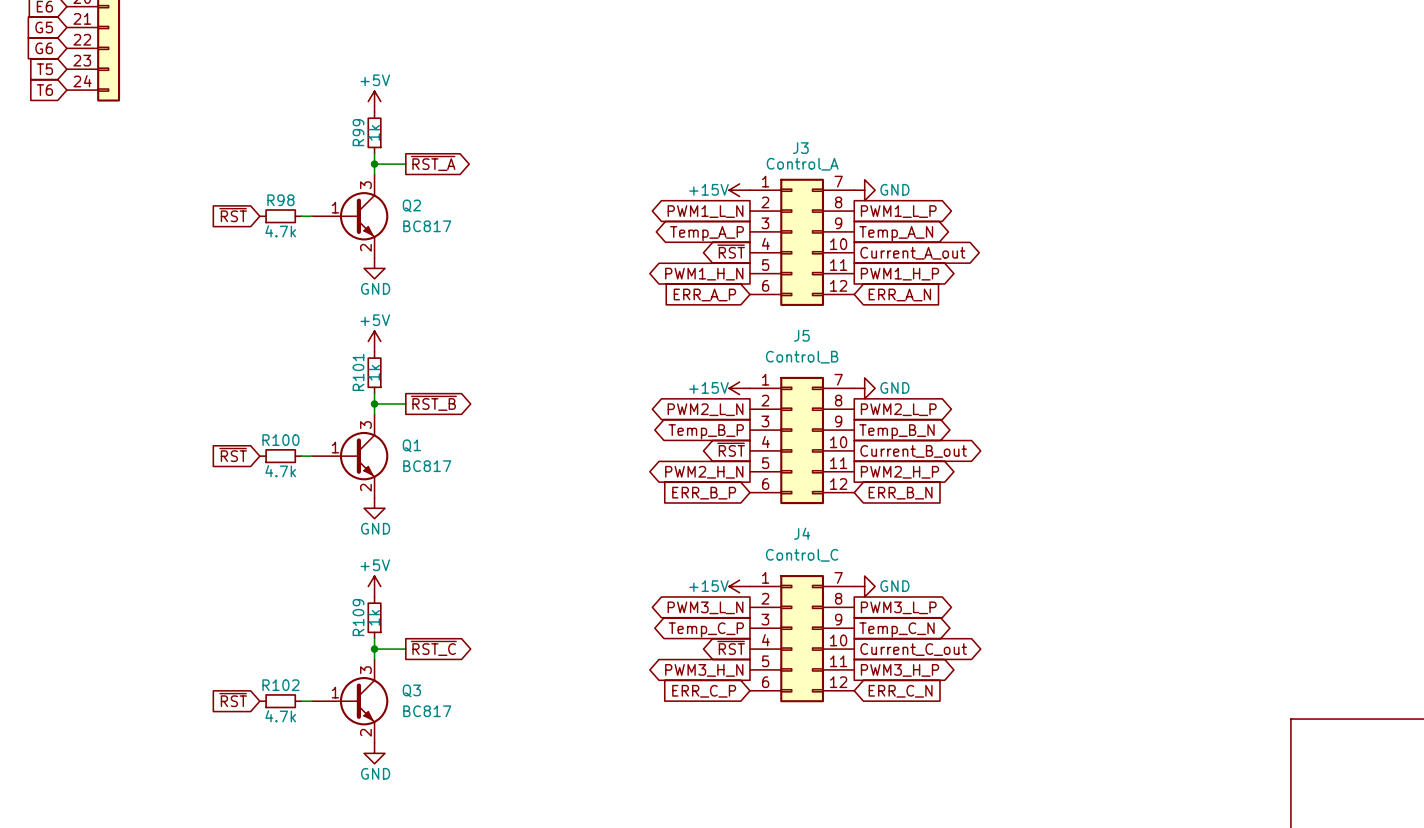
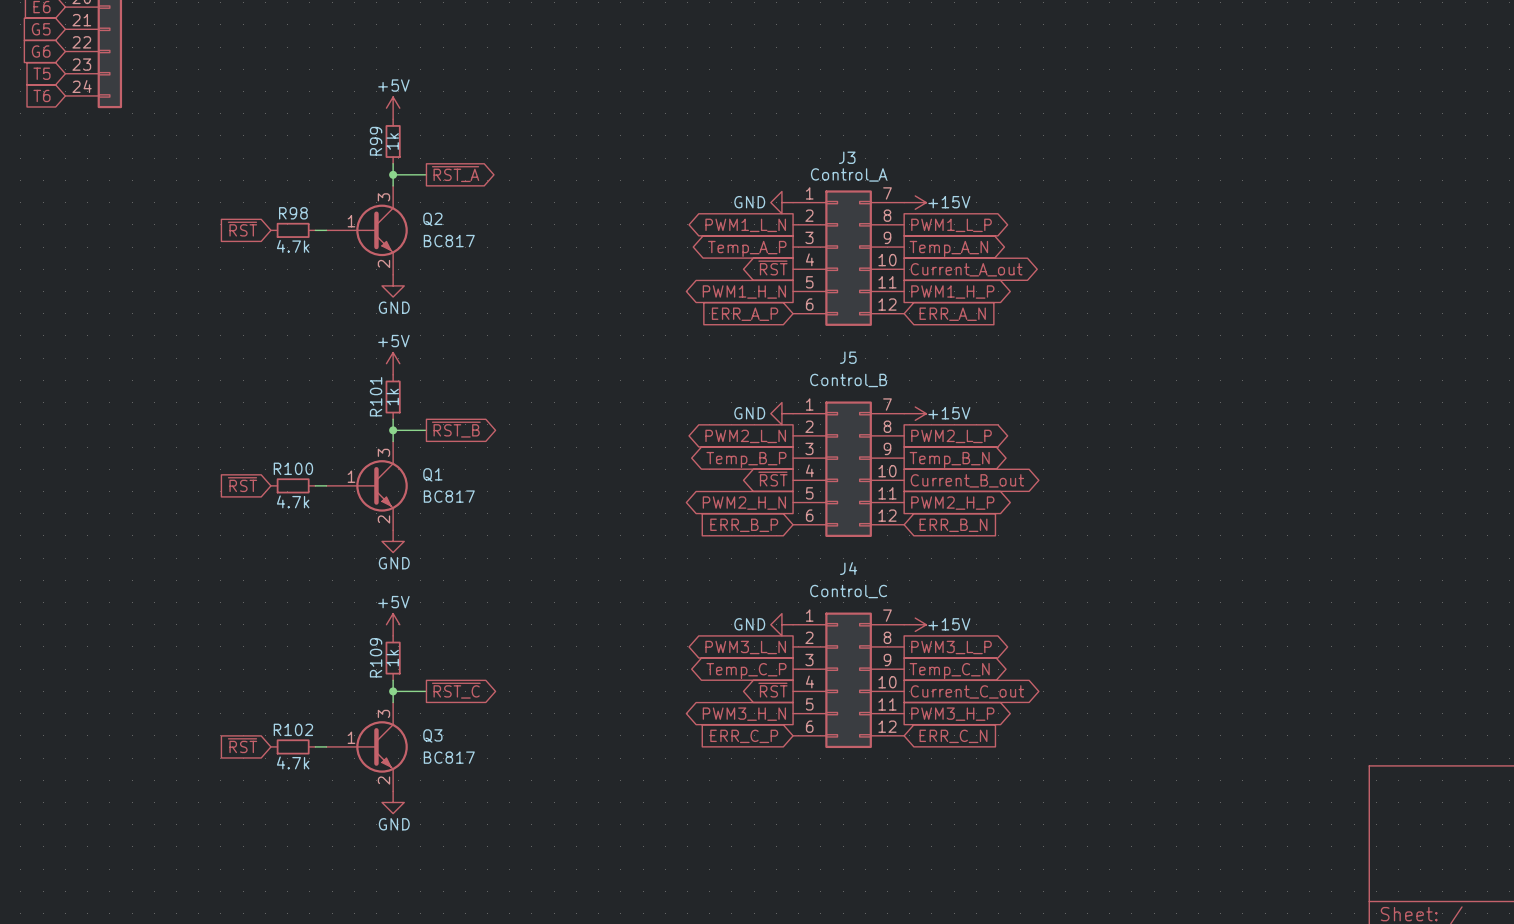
power symbol: +15V (739, 190) -> GND (781, 202)
power symbol: GND (864, 190) -> +15V (915, 202)
power symbol: +15V (739, 388) -> GND (781, 413)
power symbol: GND (864, 388) -> +15V (915, 413)
power symbol: +15V (739, 586) -> GND (781, 624)
power symbol: GND (864, 586) -> +15V (915, 624)

